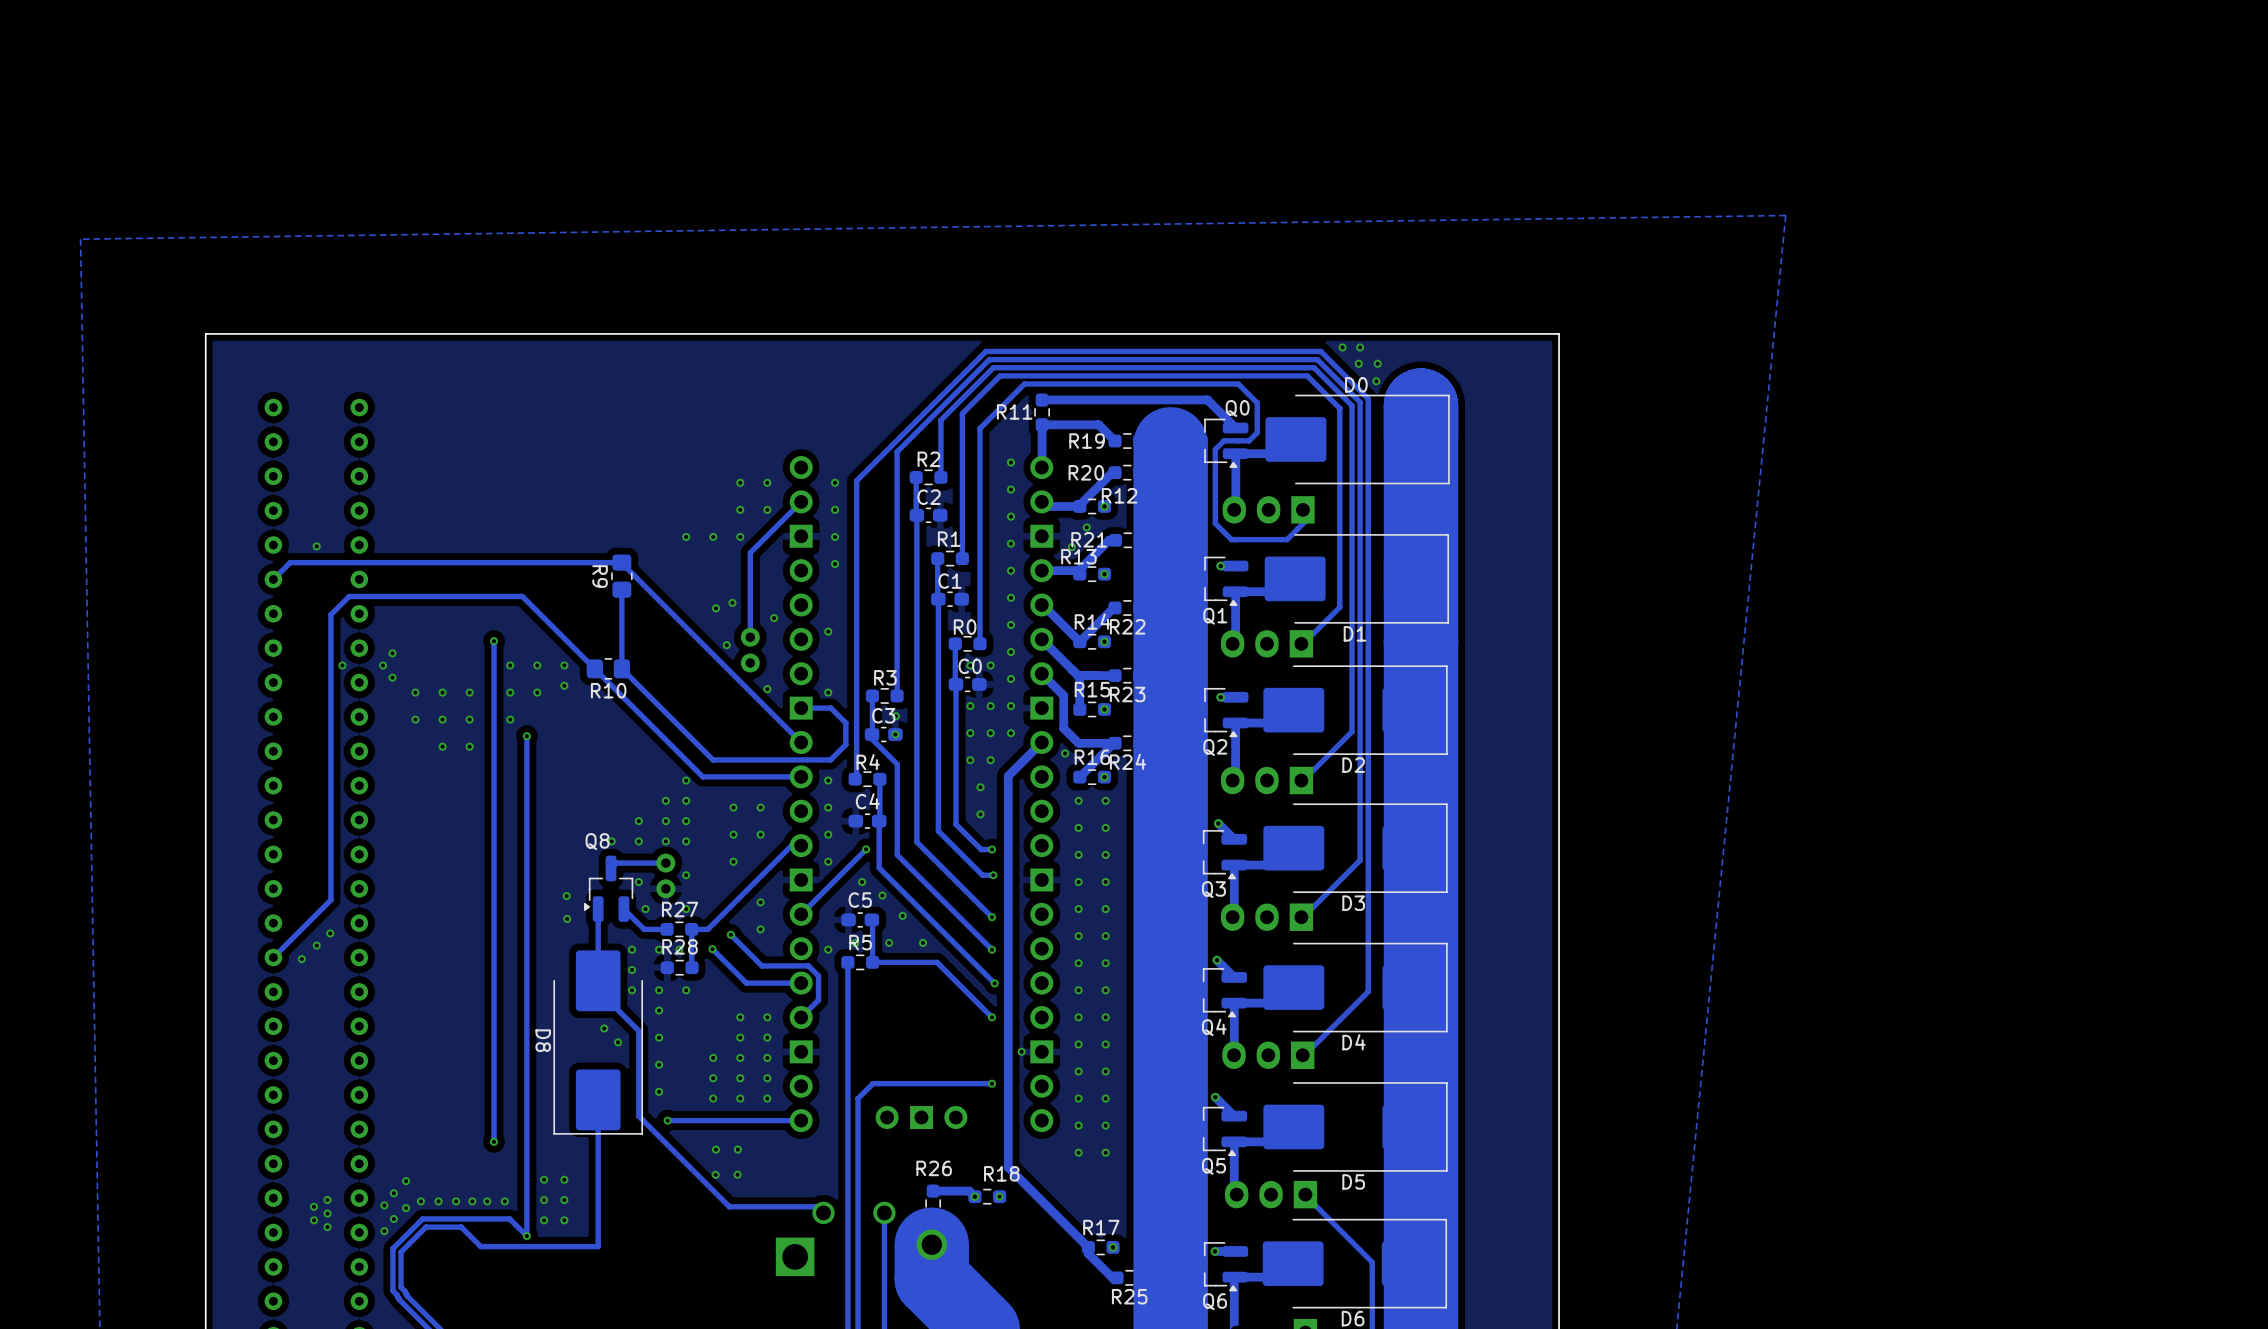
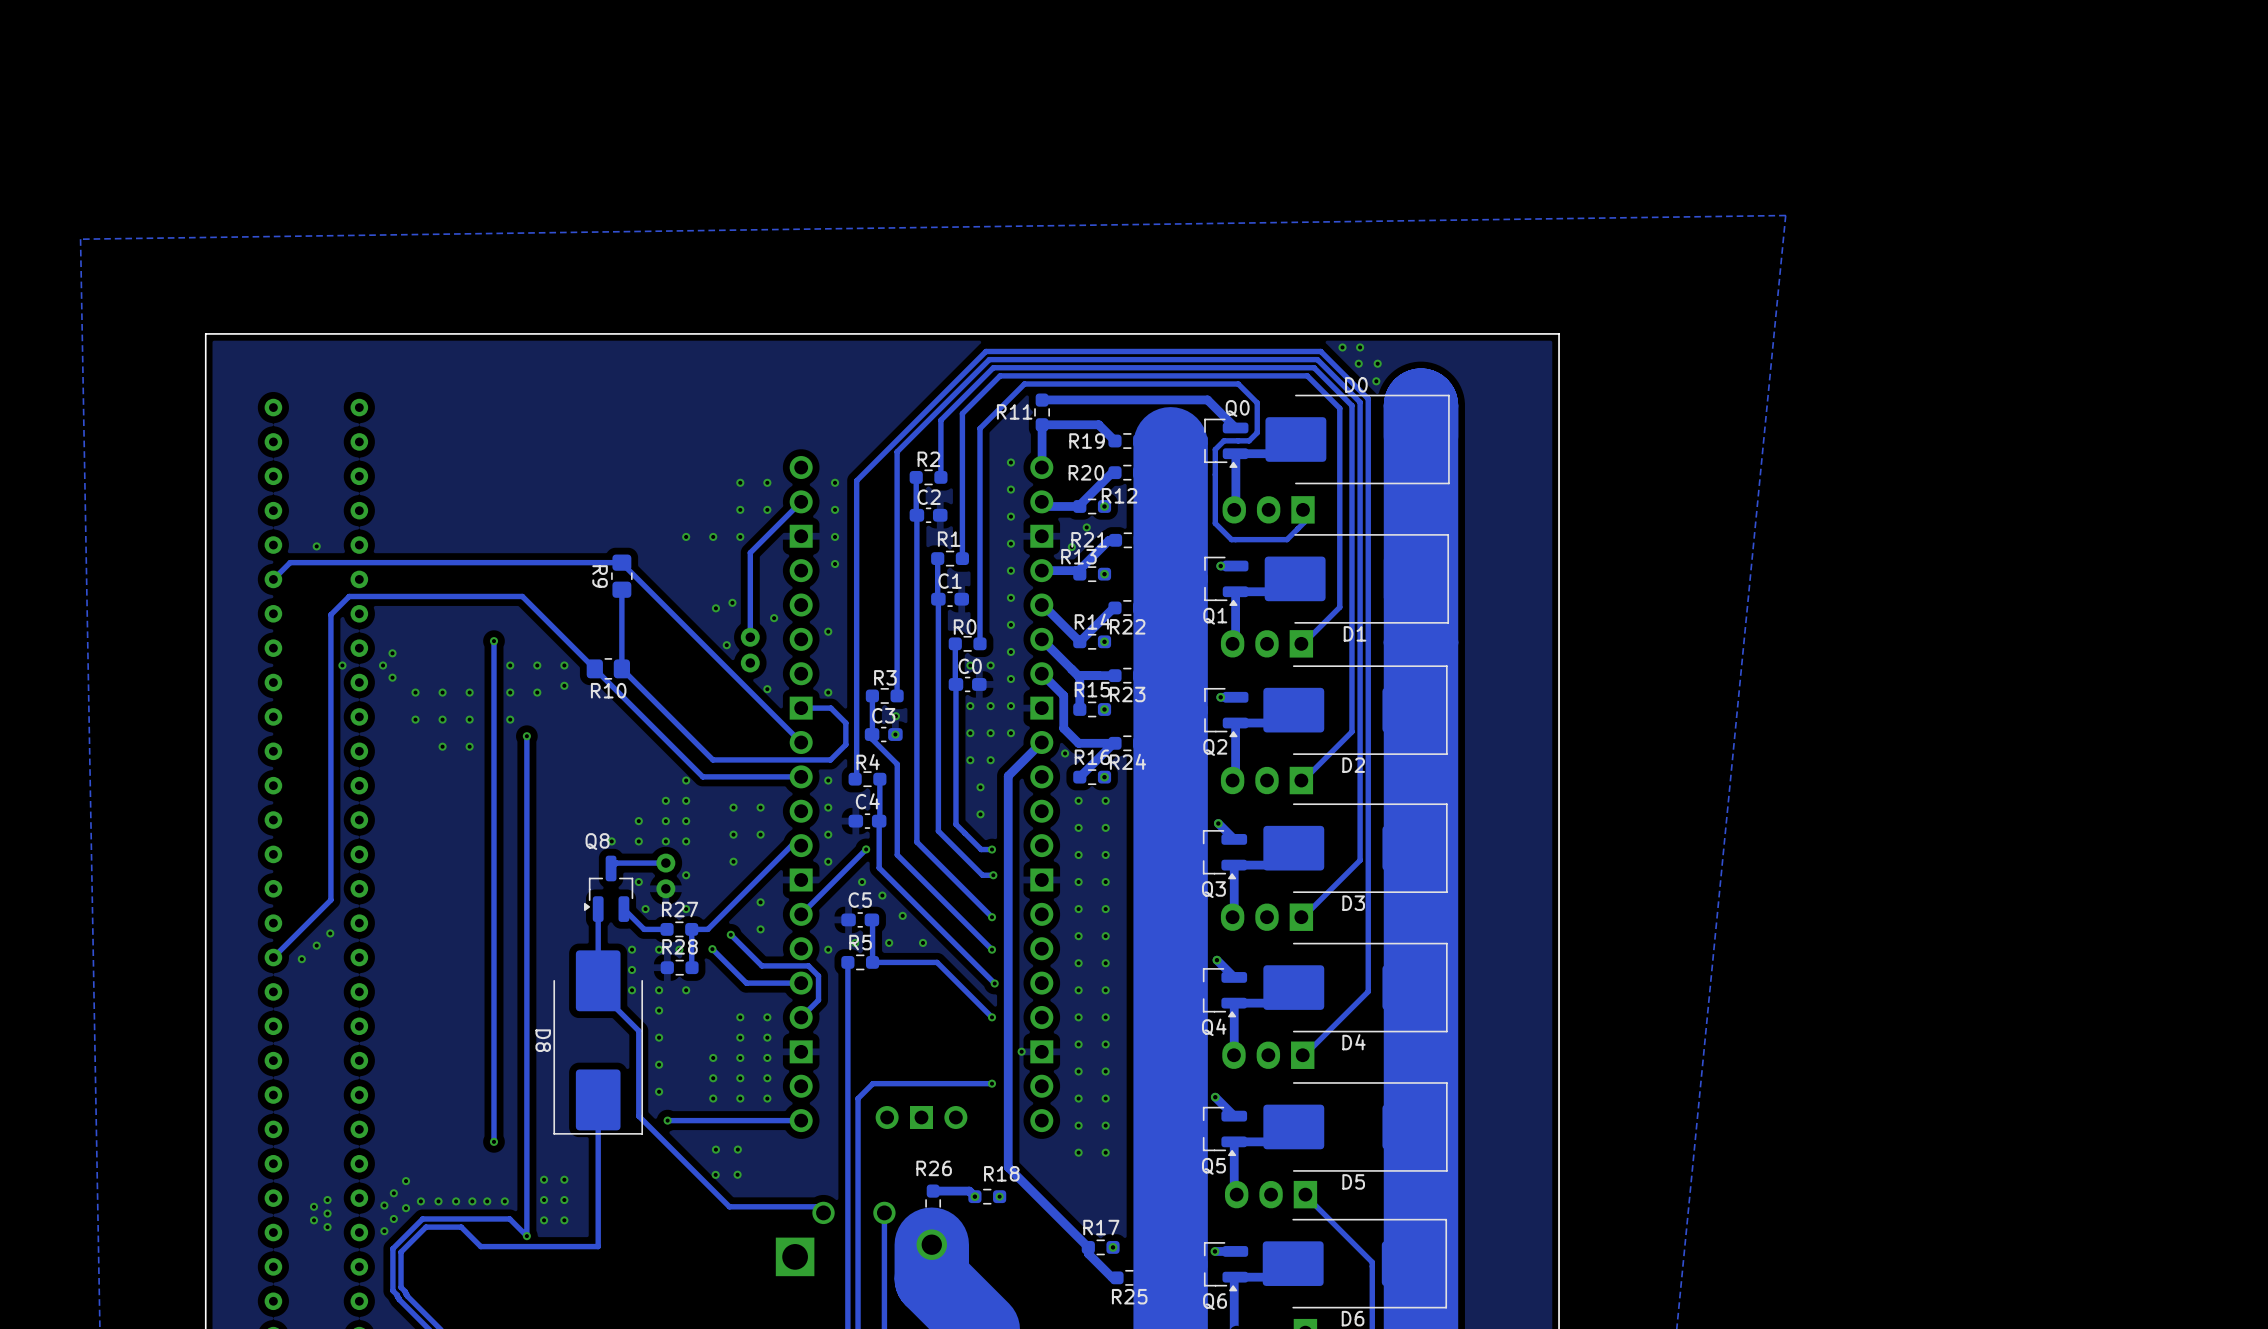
via: (566, 896) -> none
via: (567, 918) -> none
via: (604, 1028) -> none
via: (618, 1042) -> none

